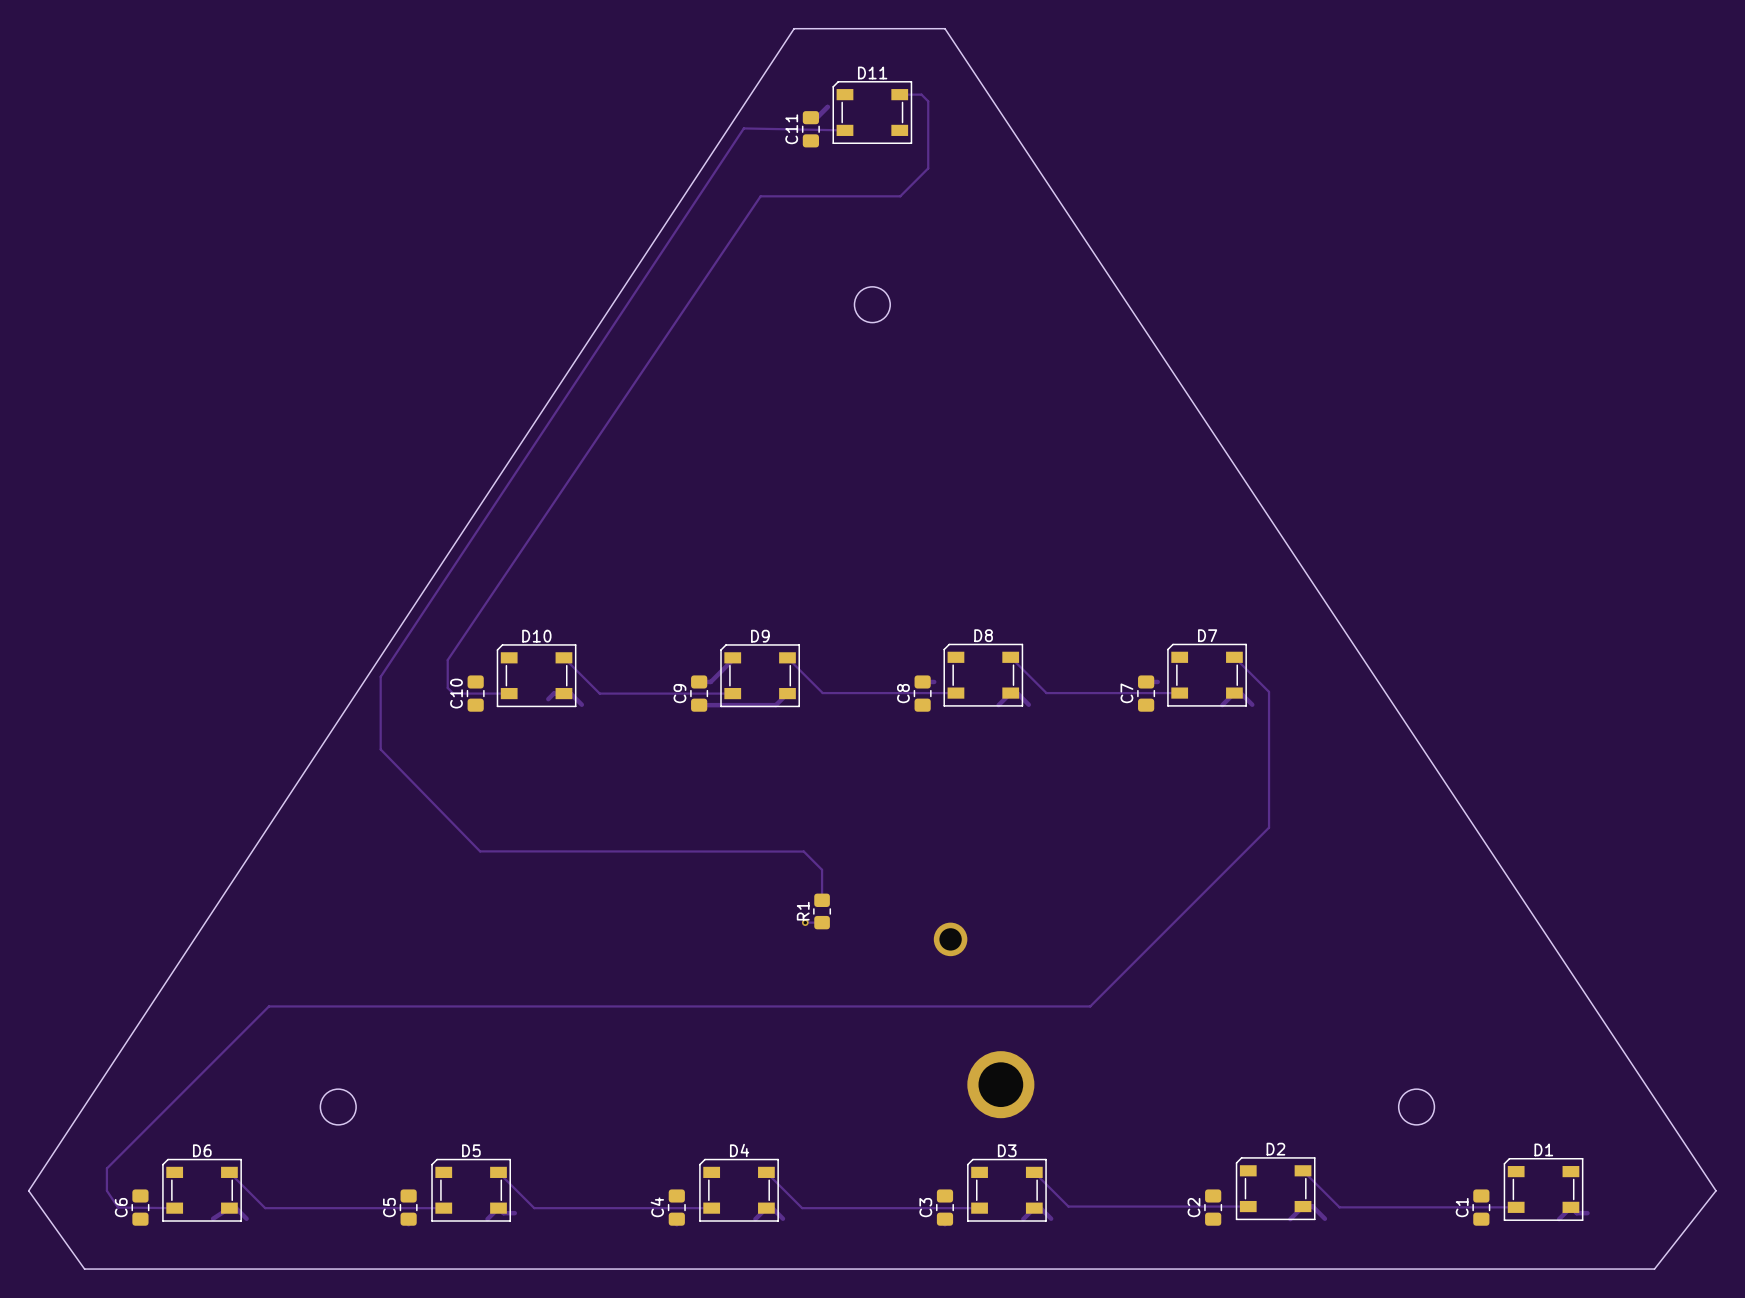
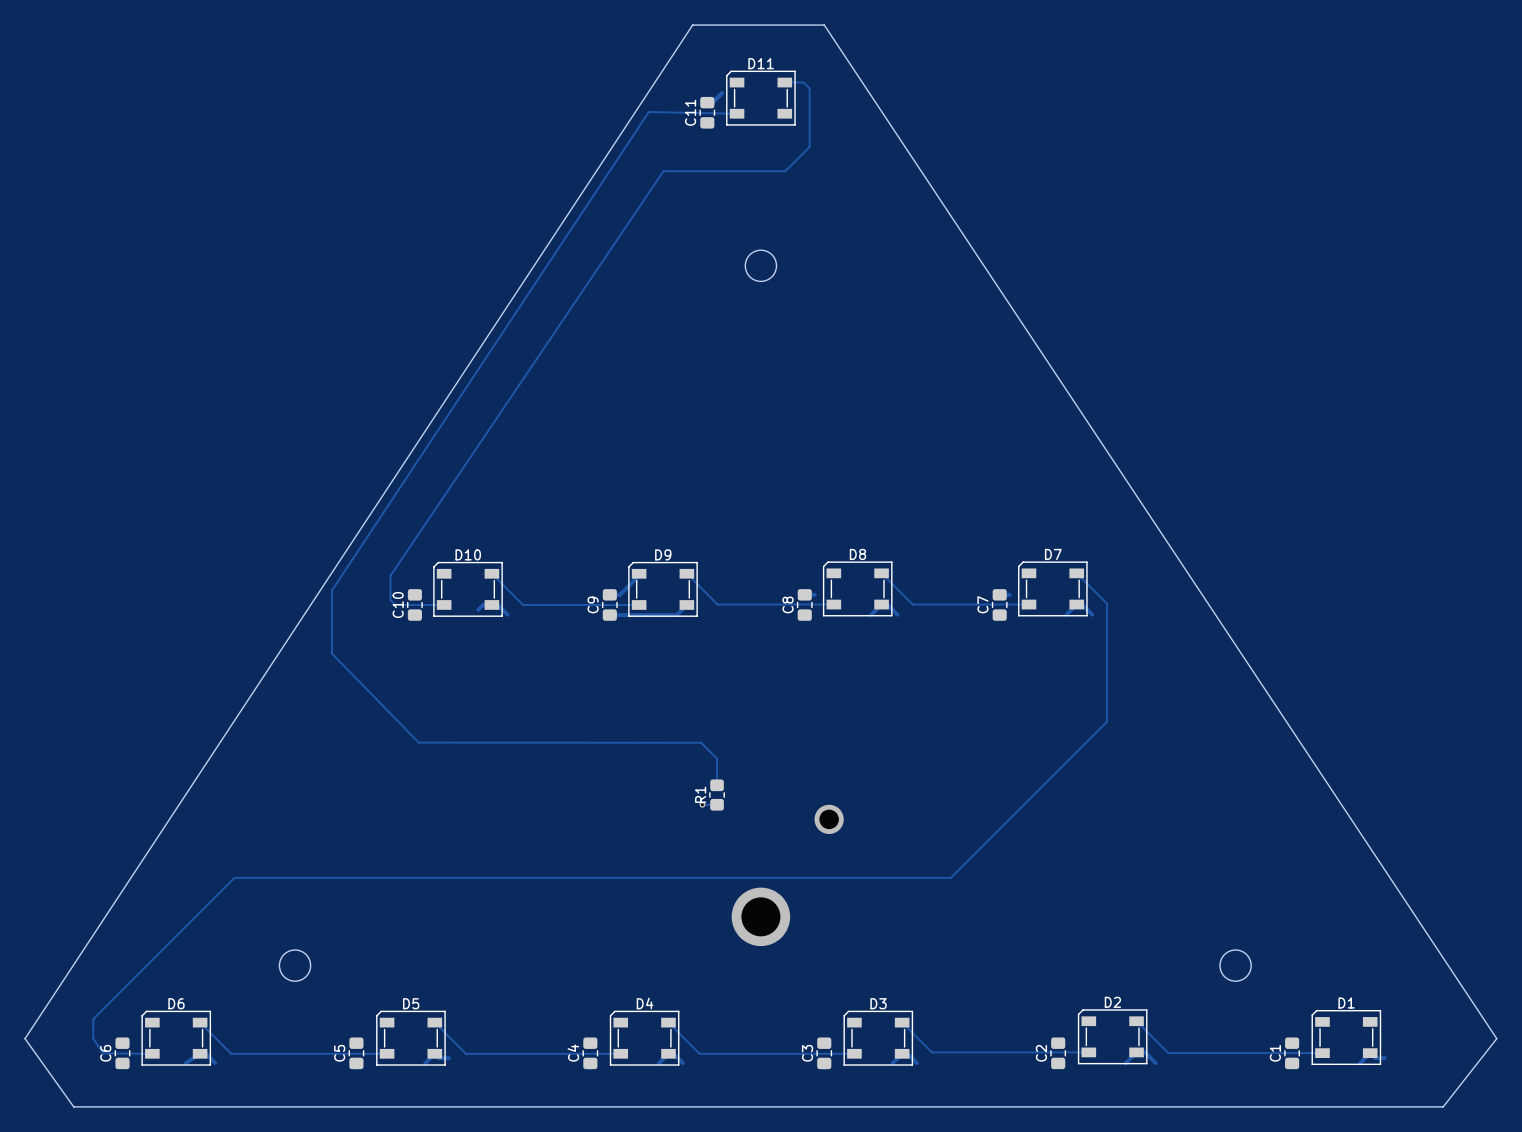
via: none -> (760, 916)
via: (1000, 1084) -> none

